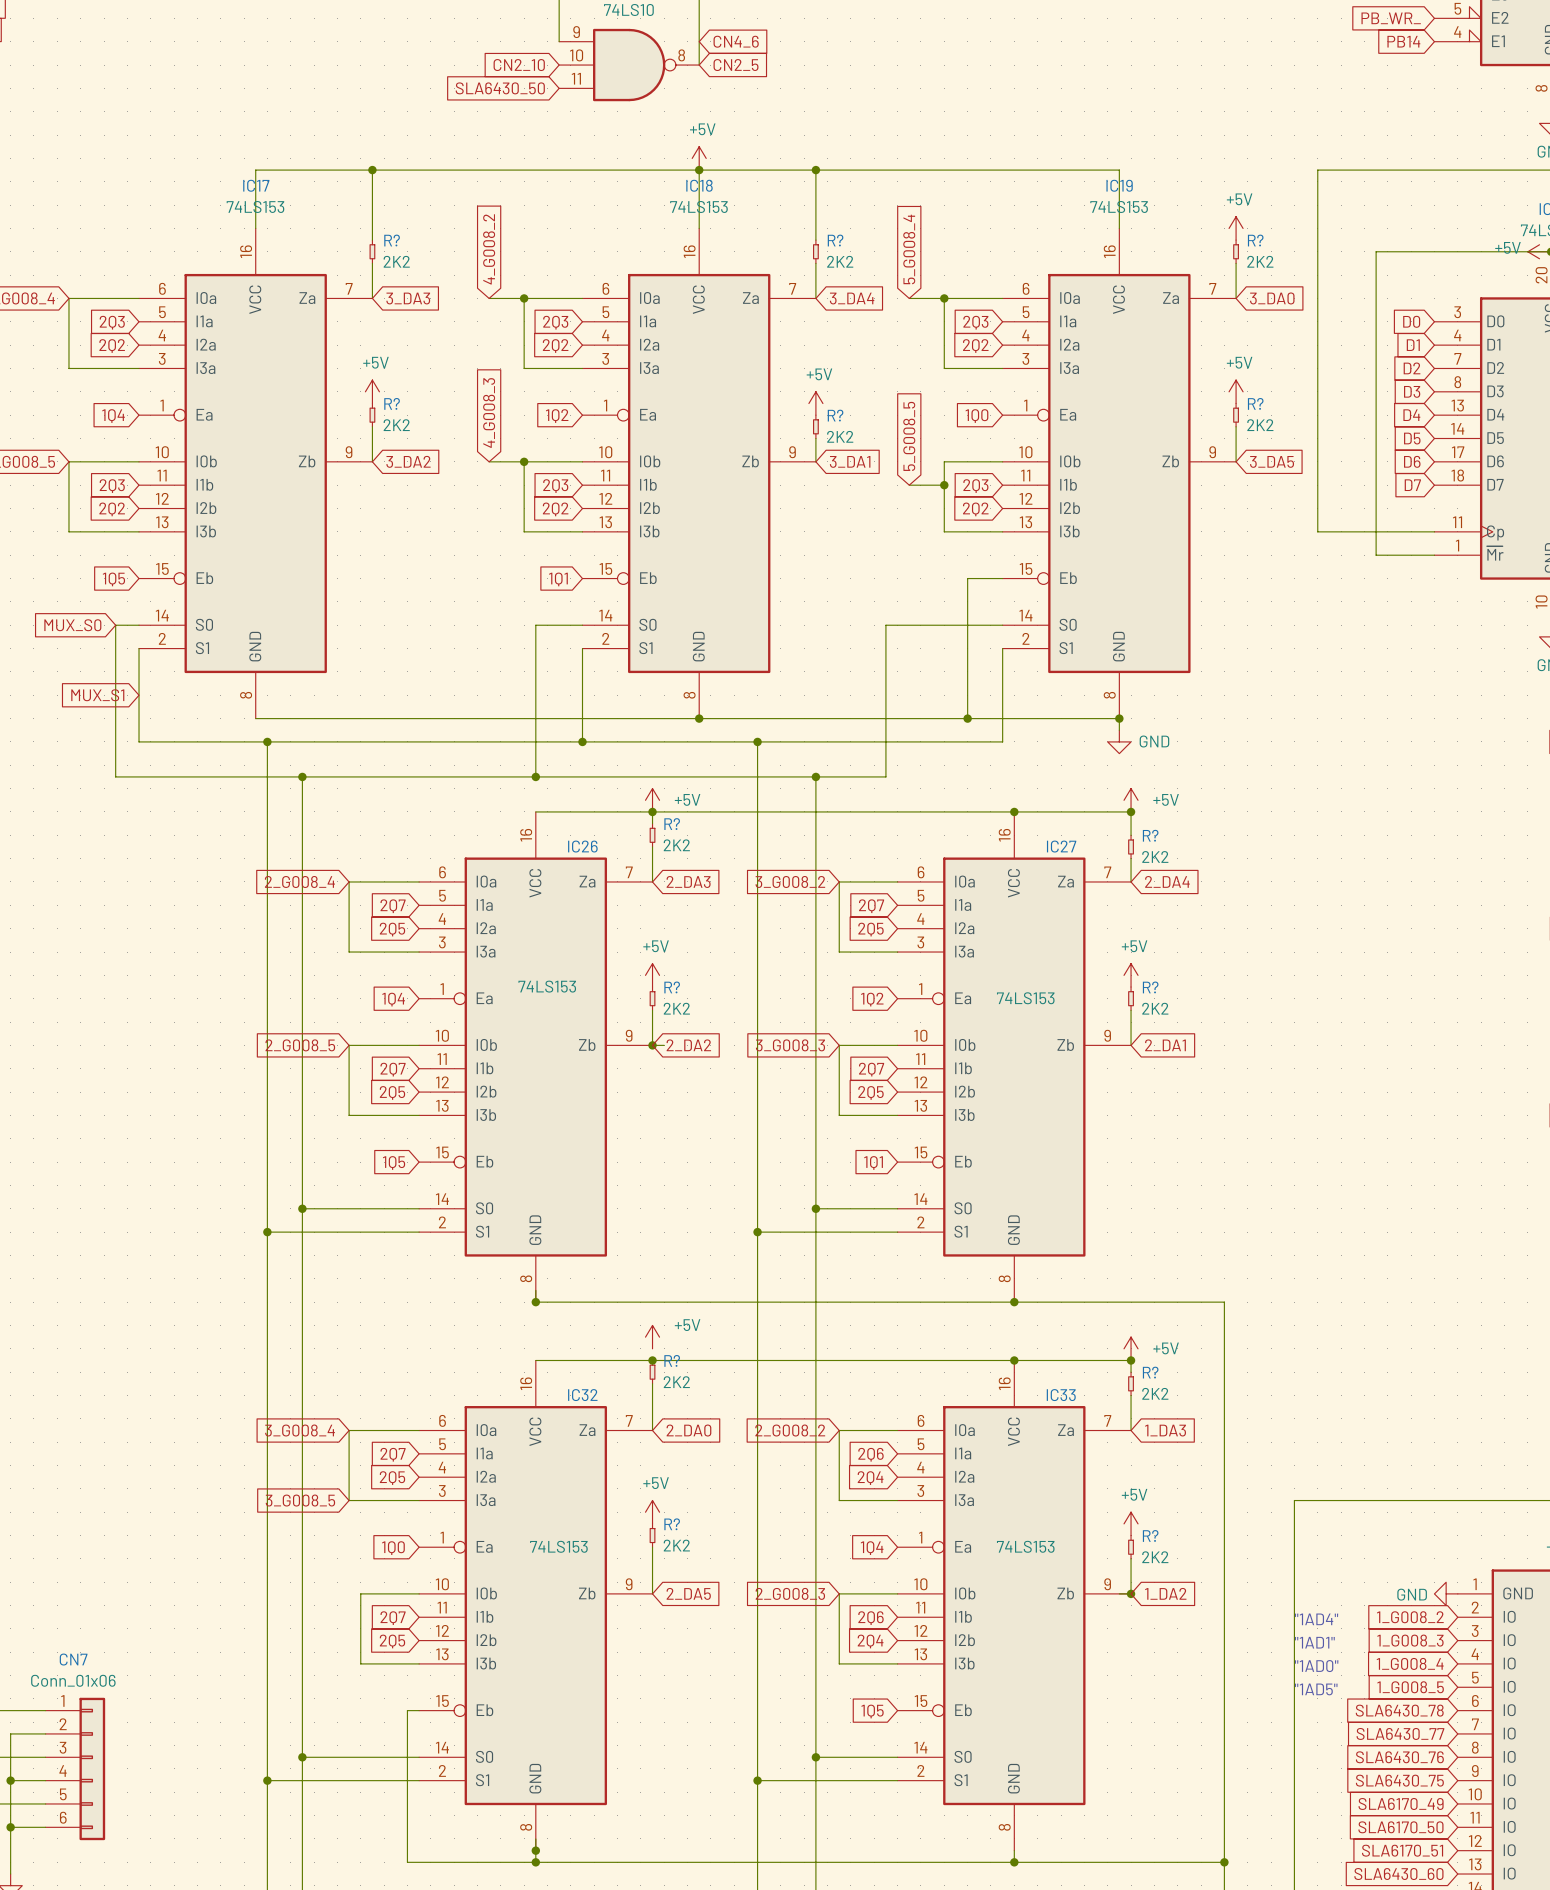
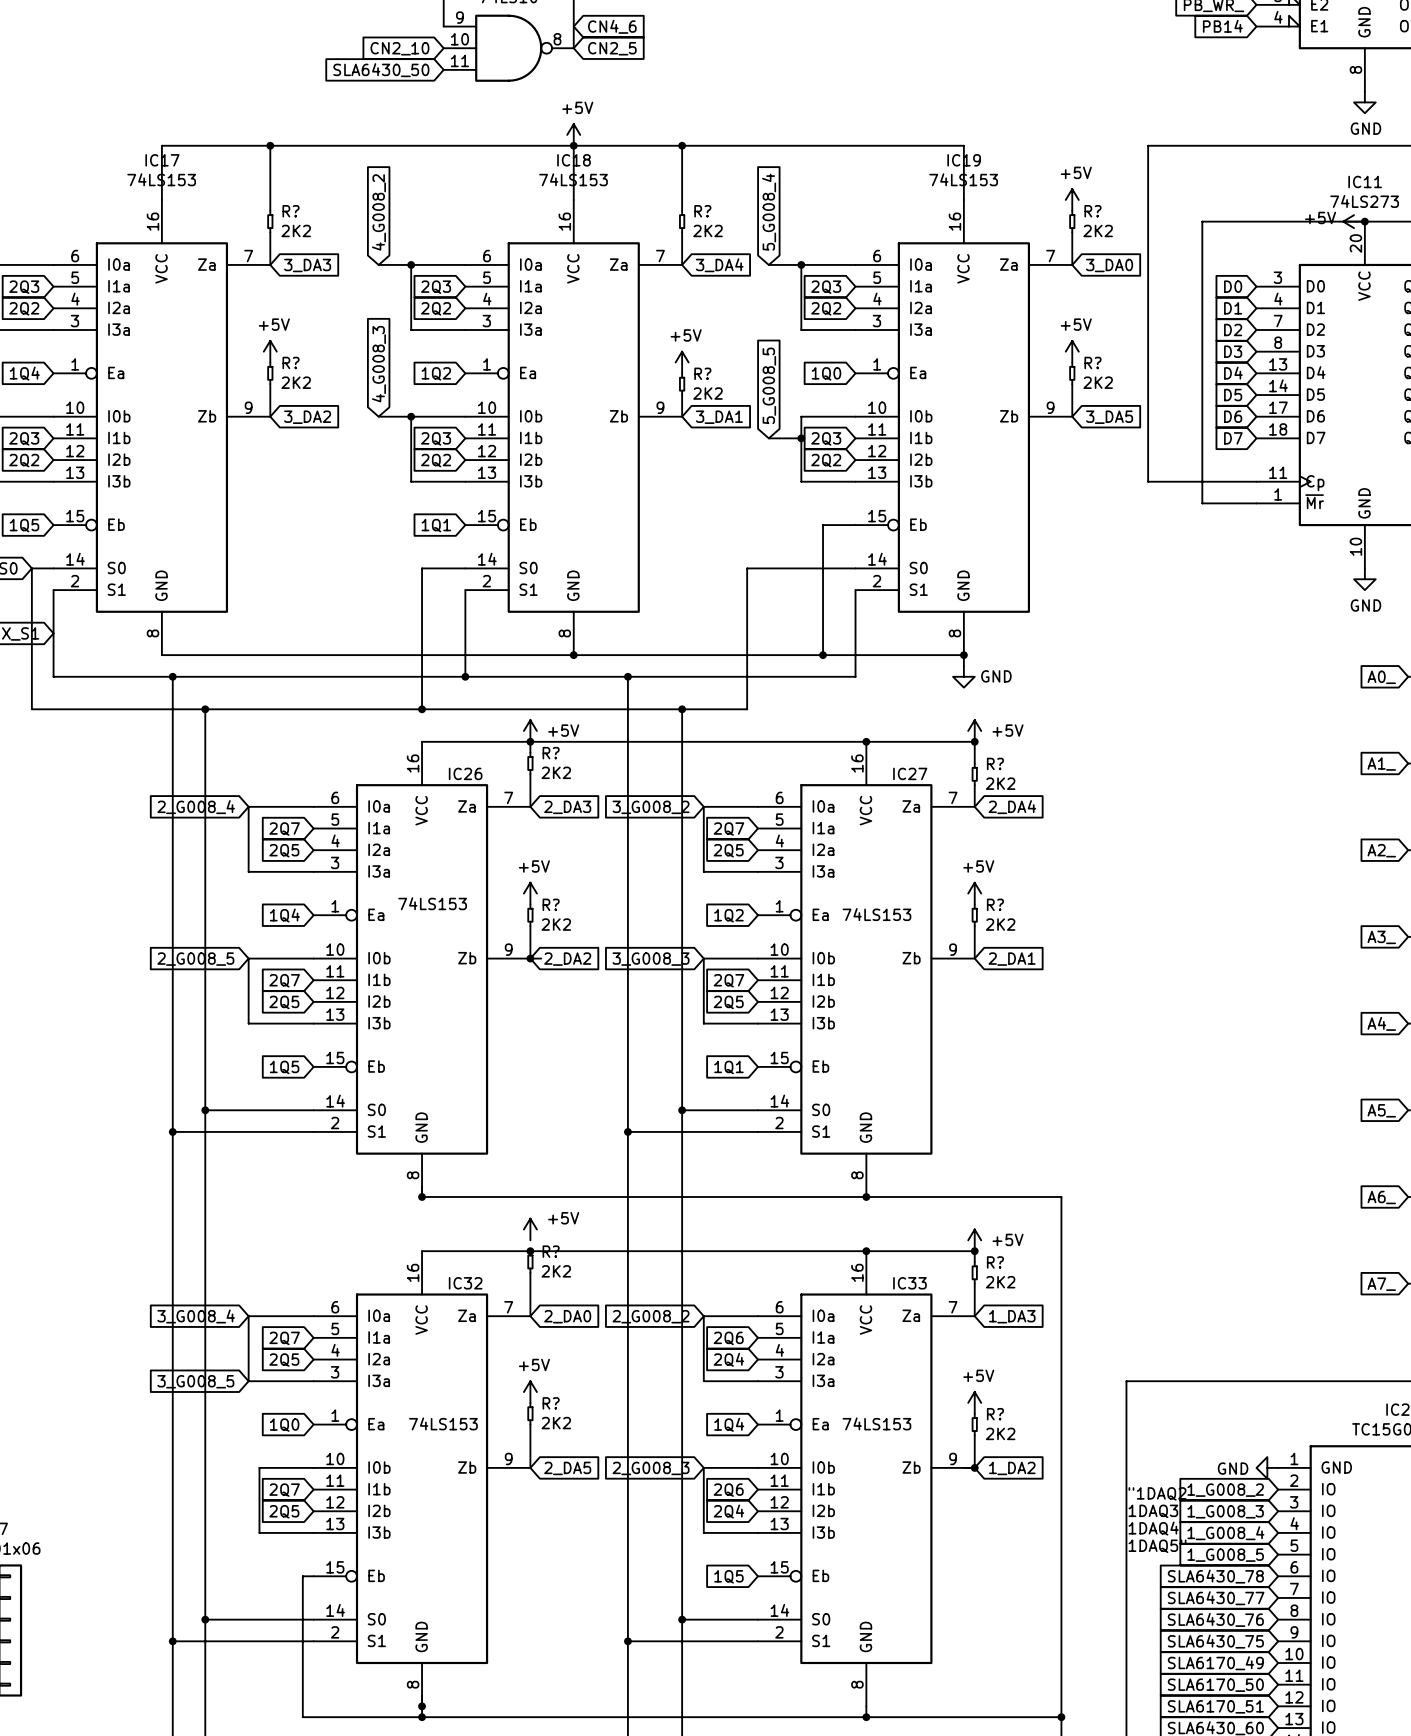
text: "1AD4" (1316, 1619) -> "1DAQ2 (1157, 1493)
text: "1AD1" (1314, 1642) -> 1DAQ3 (1153, 1511)
text: none -> 1DAQ4 (1153, 1528)
text: "1AD0" (1316, 1666) -> none
text: "1AD5" (1316, 1689) -> 1DAQ5" (1157, 1546)

